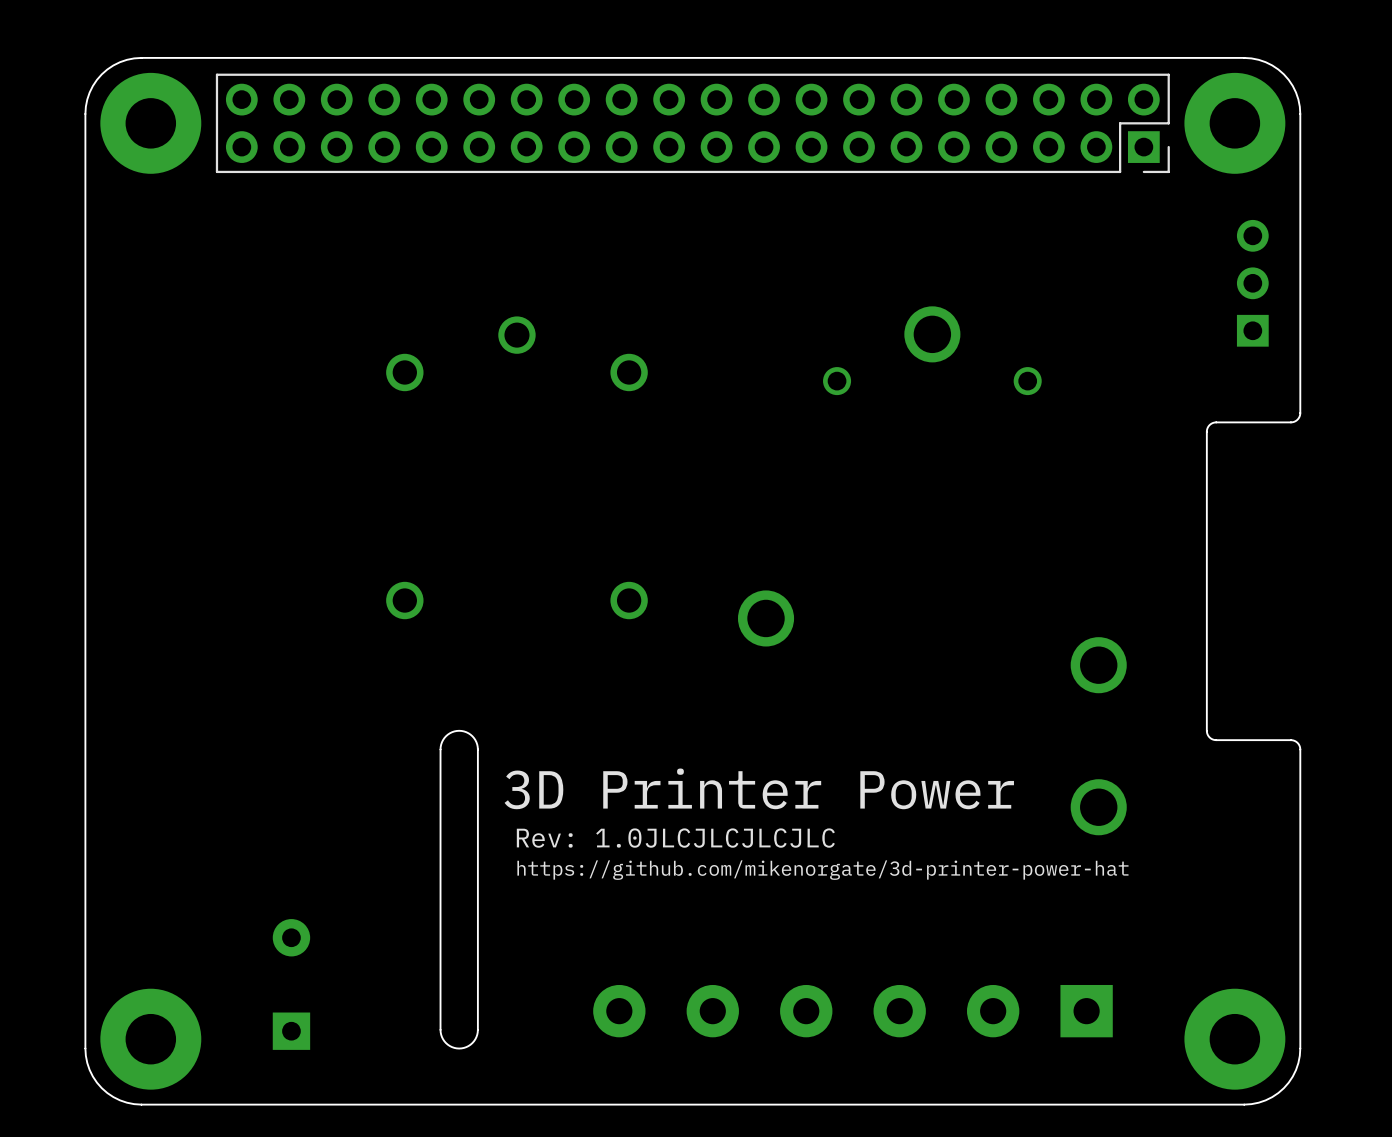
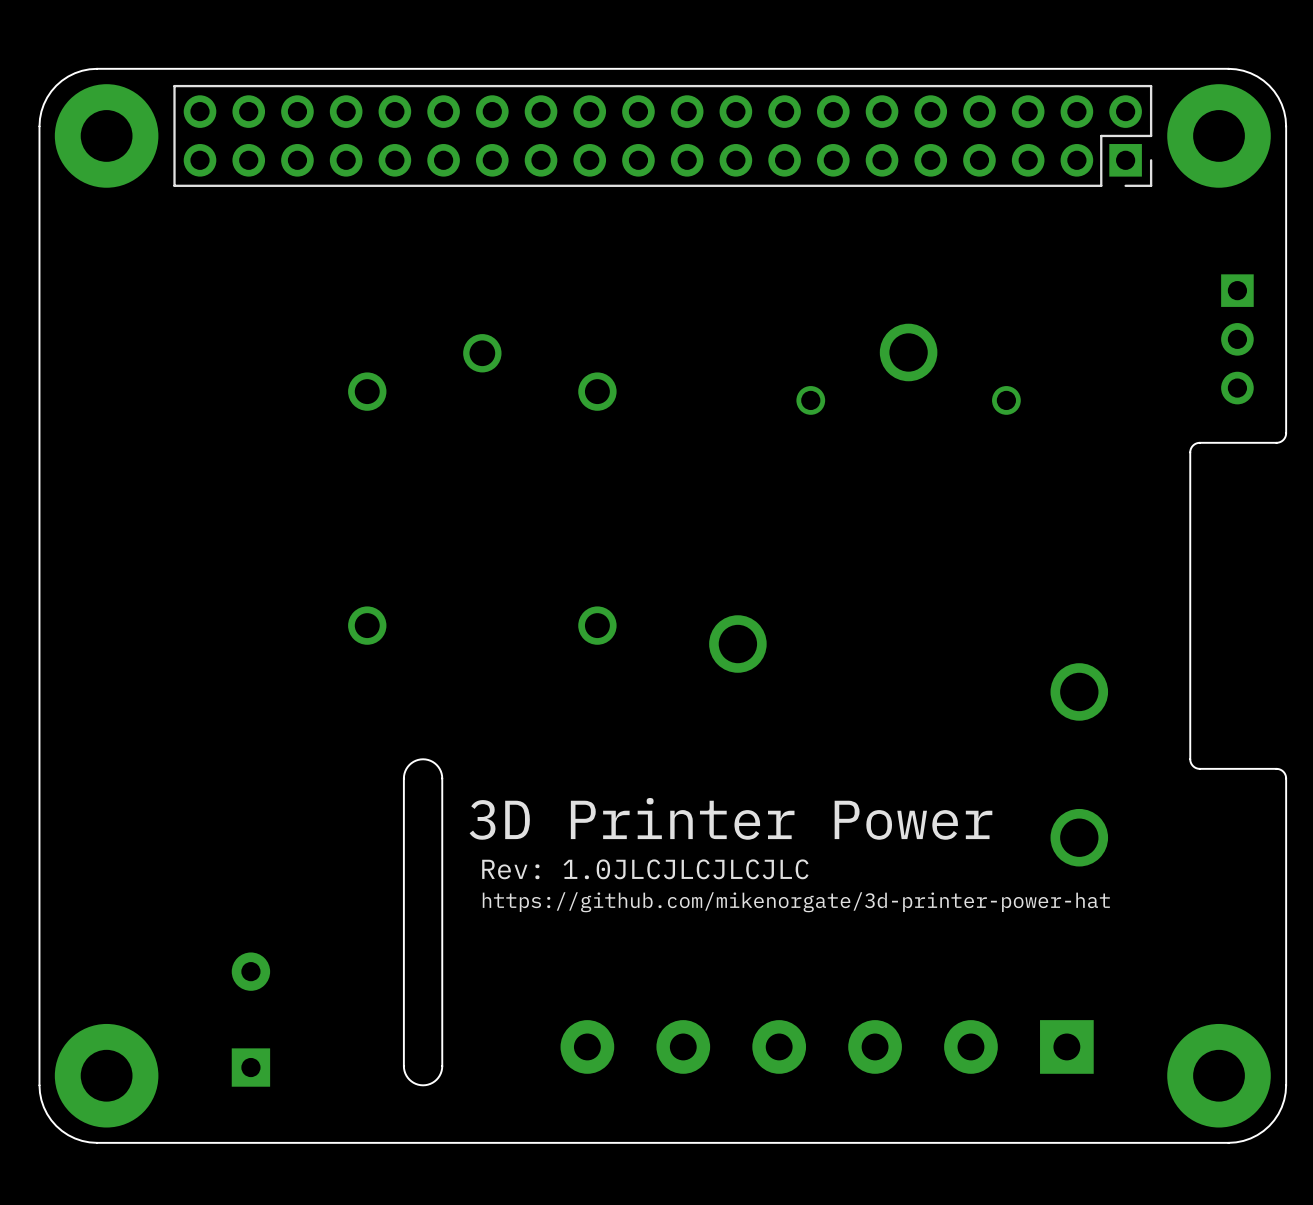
part rotation: 0° (1252, 283) -> 180° (1237, 339)

